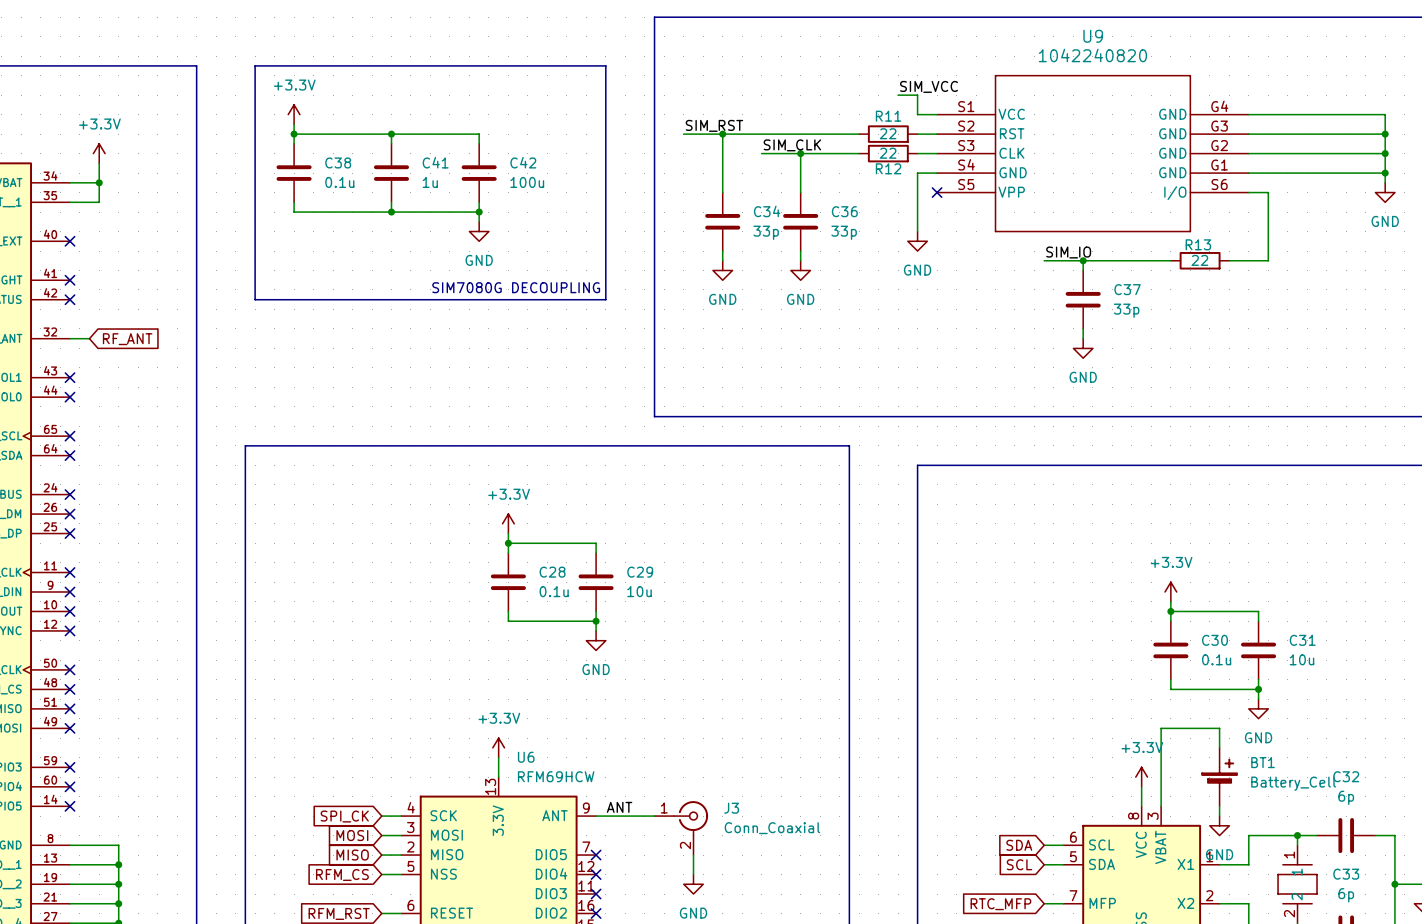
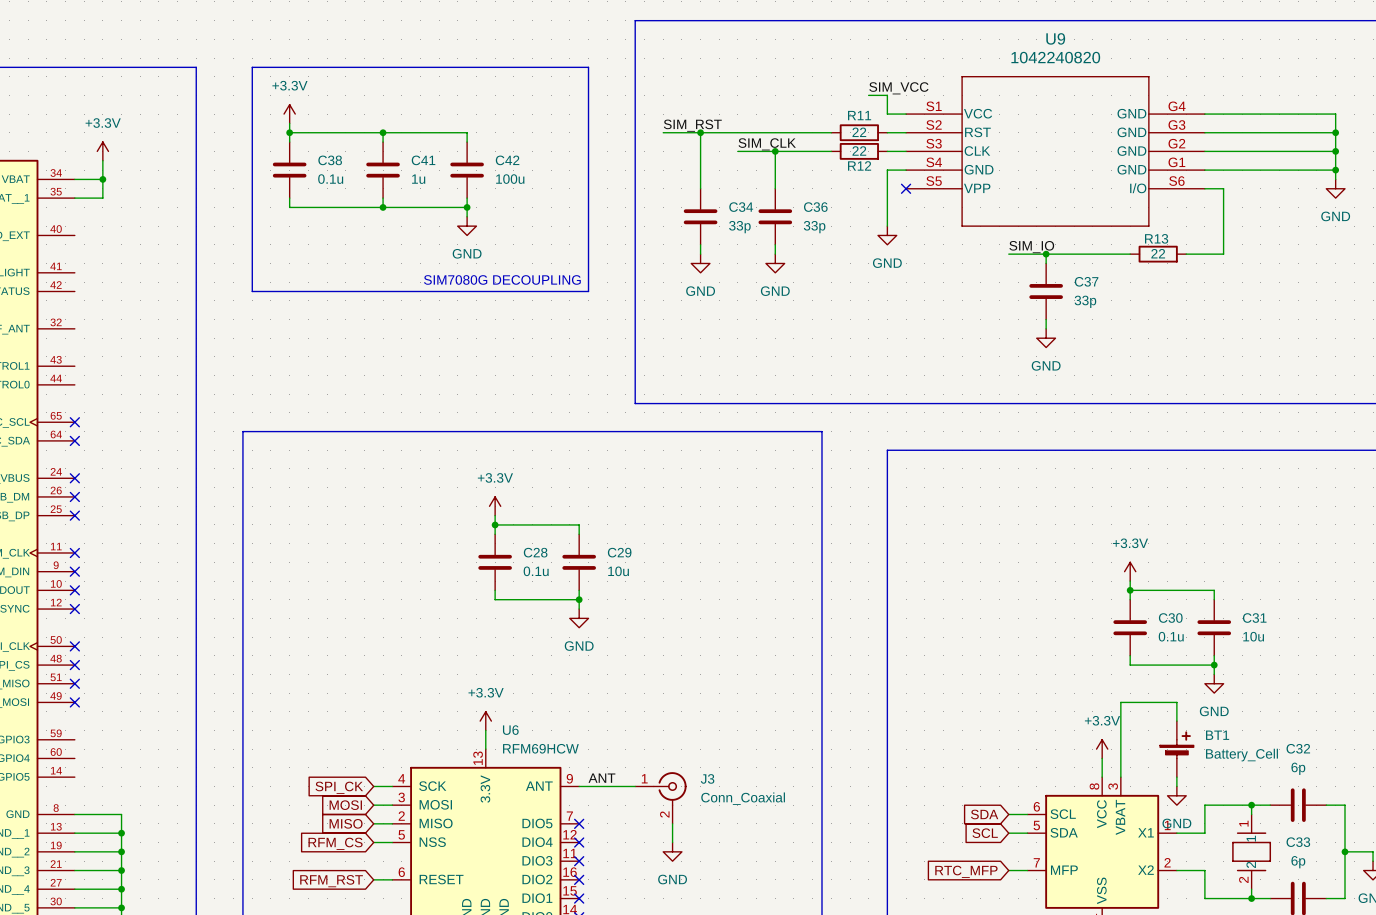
no-connect mark: (70, 241) -> none
no-connect mark: (70, 280) -> none
no-connect mark: (70, 299) -> none
wire: (70, 338) (89, 338) -> none
global label: RF_ANT (127, 339) -> none
no-connect mark: (70, 377) -> none
no-connect mark: (70, 397) -> none
no-connect mark: (70, 767) -> none
no-connect mark: (70, 786) -> none
no-connect mark: (70, 806) -> none

